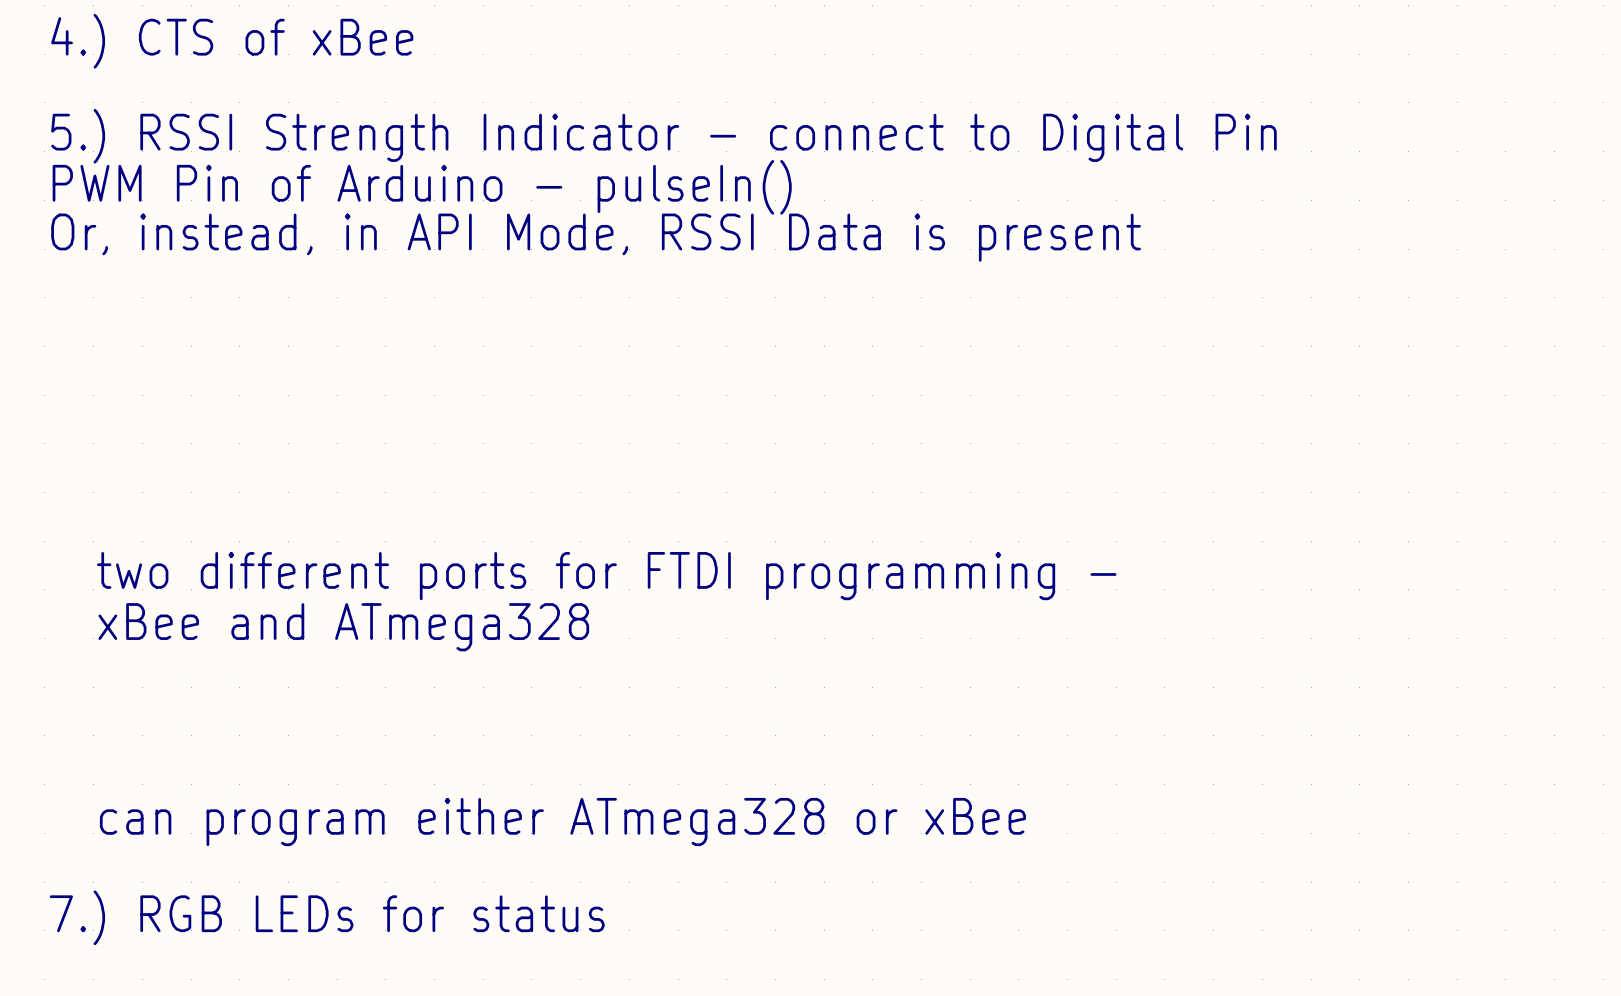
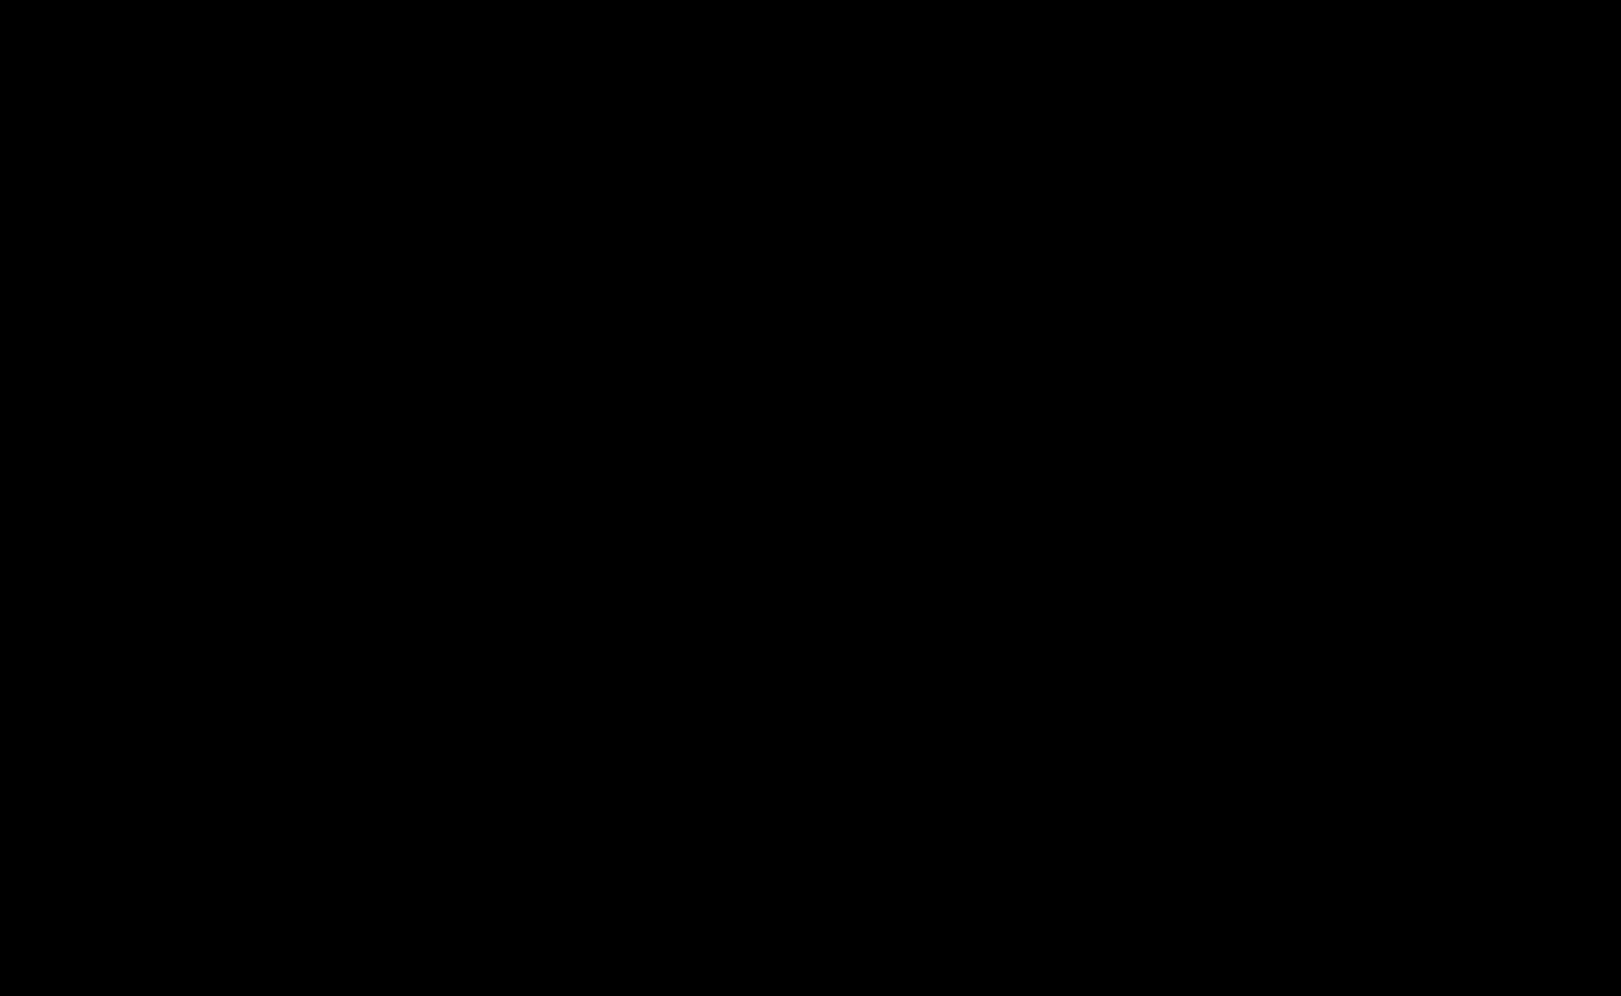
text: 4.) CTS of xBee (232, 41) -> none
text: 5.) RSSI Strength Indicator - connect to Digital Pin (663, 136) -> none
text: PWM Pin of Arduino - pulseIn() (422, 187) -> none
text: Or, instead, in API Mode, RSSI Data is present (596, 237) -> none
text: two different ports for FTDI programming - (606, 576) -> none
text: xBee and ATmega328 (343, 627) -> none
text: can program either ATmega328 or xBee (562, 822) -> none
text: 7.) RGB LEDs for status (327, 917) -> none

